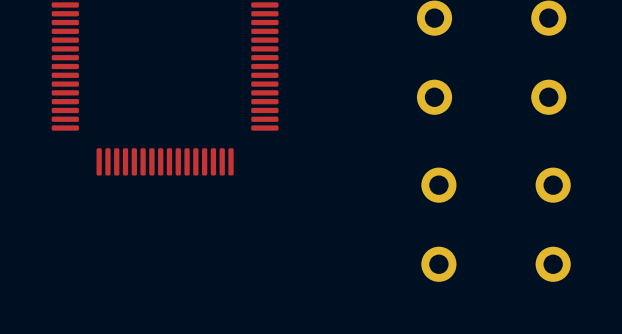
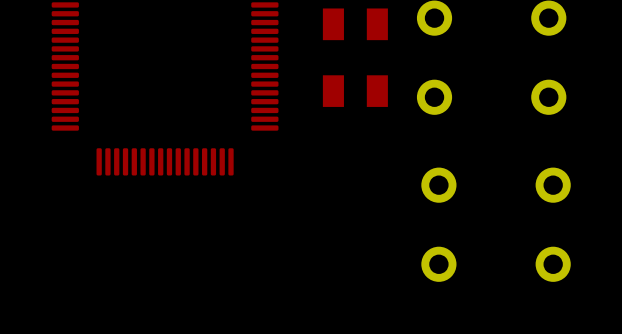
part: none -> (355, 57)

